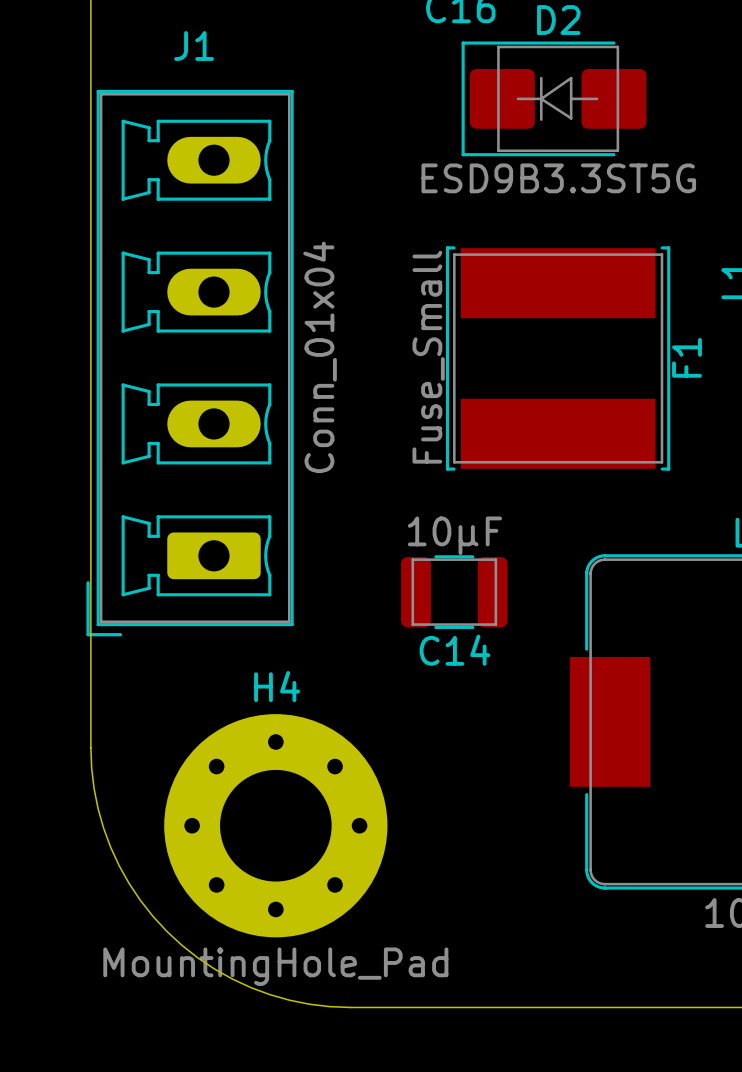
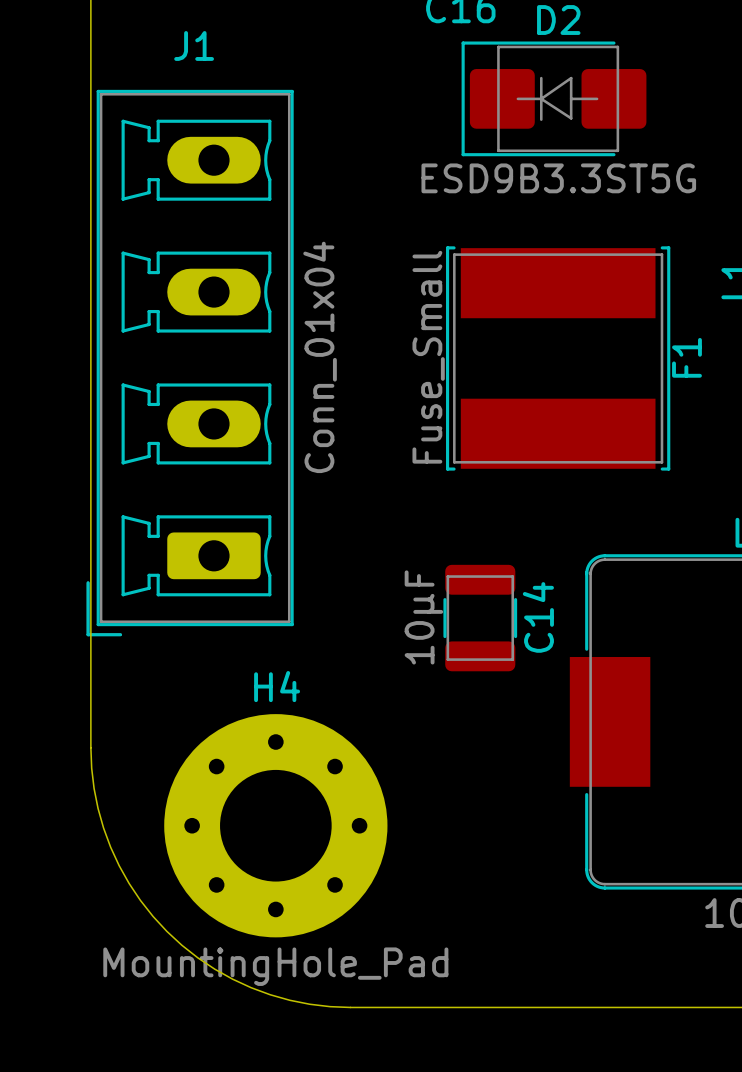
C14 value position: 10µF (454, 535) -> 10µF (423, 617)
C14 rotation: 0° (454, 592) -> 90° clockwise (480, 618)
C14 name position: C14 (454, 650) -> C14 (538, 617)

